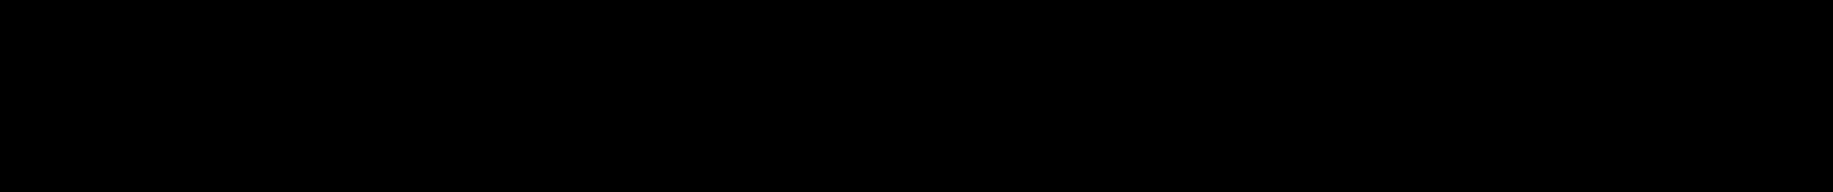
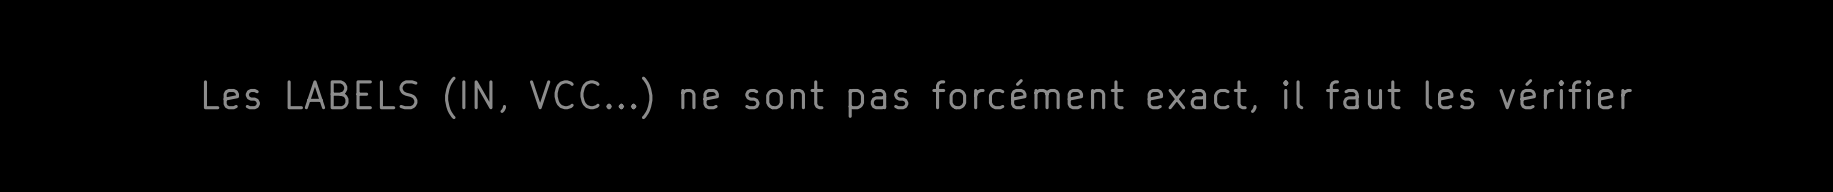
text: none -> Les LABELS (IN, VCC...) ne sont pas forcément exact, il faut les vérifier (917, 97)

